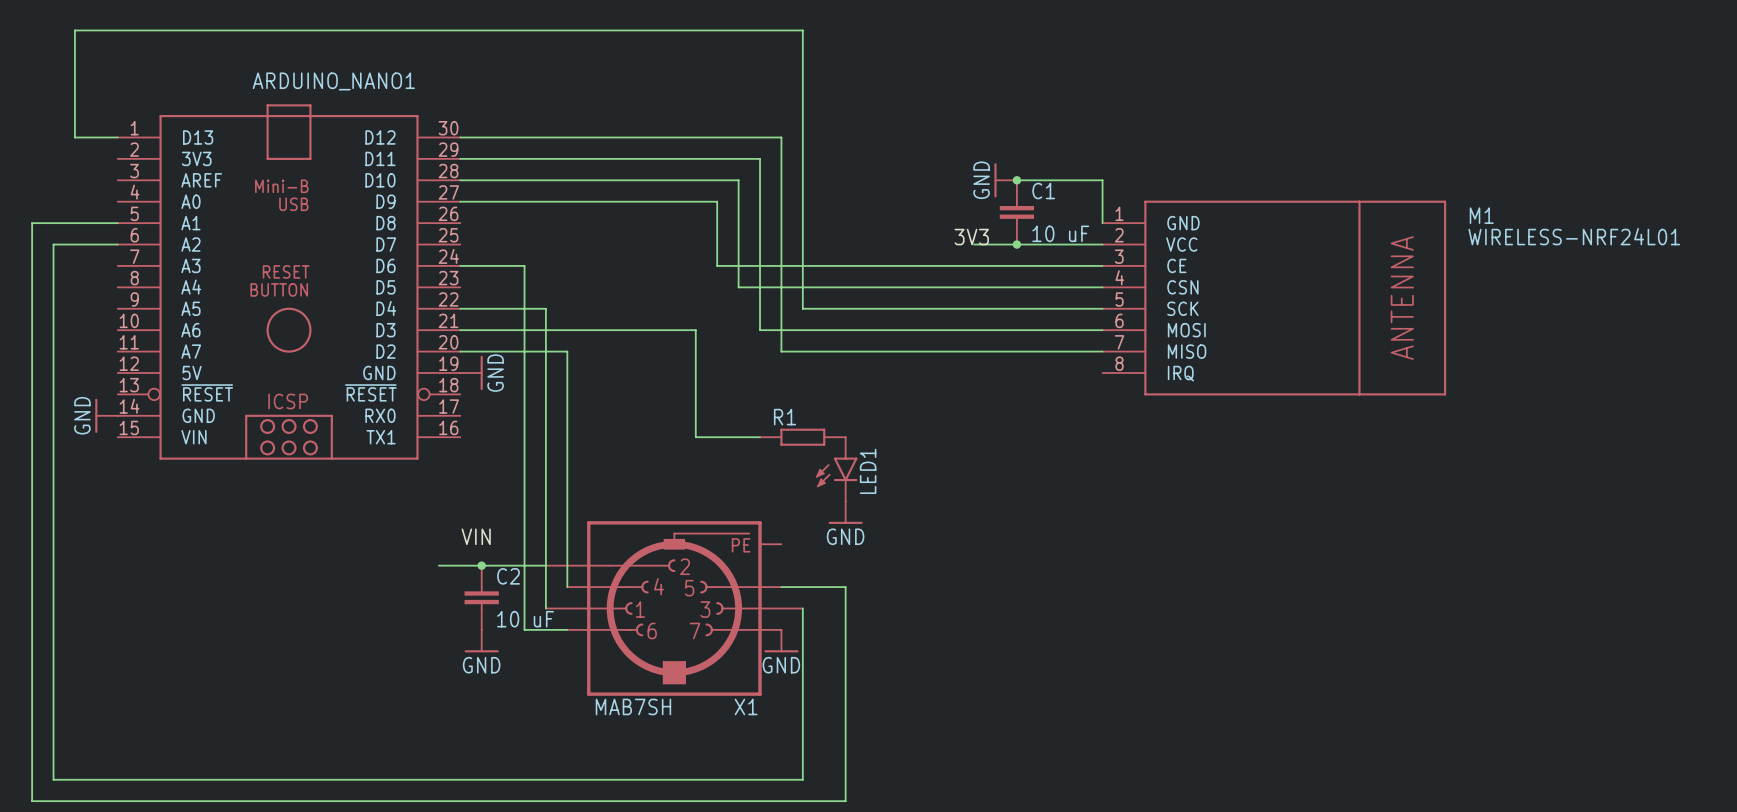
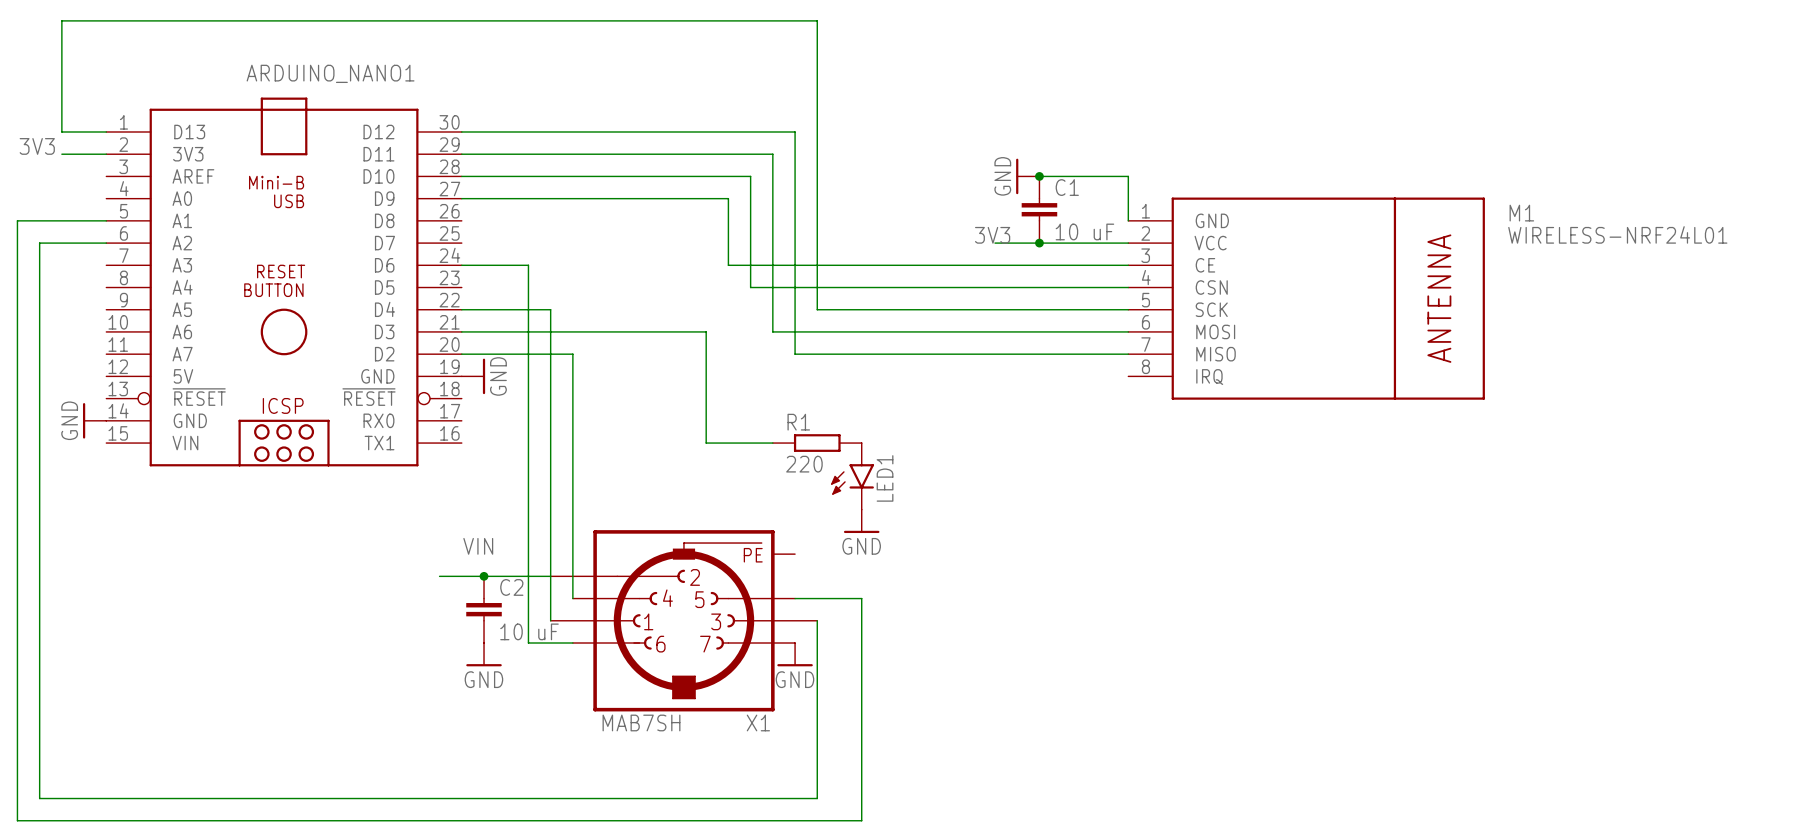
label: none -> 3V3 (37, 146)
wire: none -> (61, 154) (106, 154)
R1 value: none -> 220 (804, 464)

